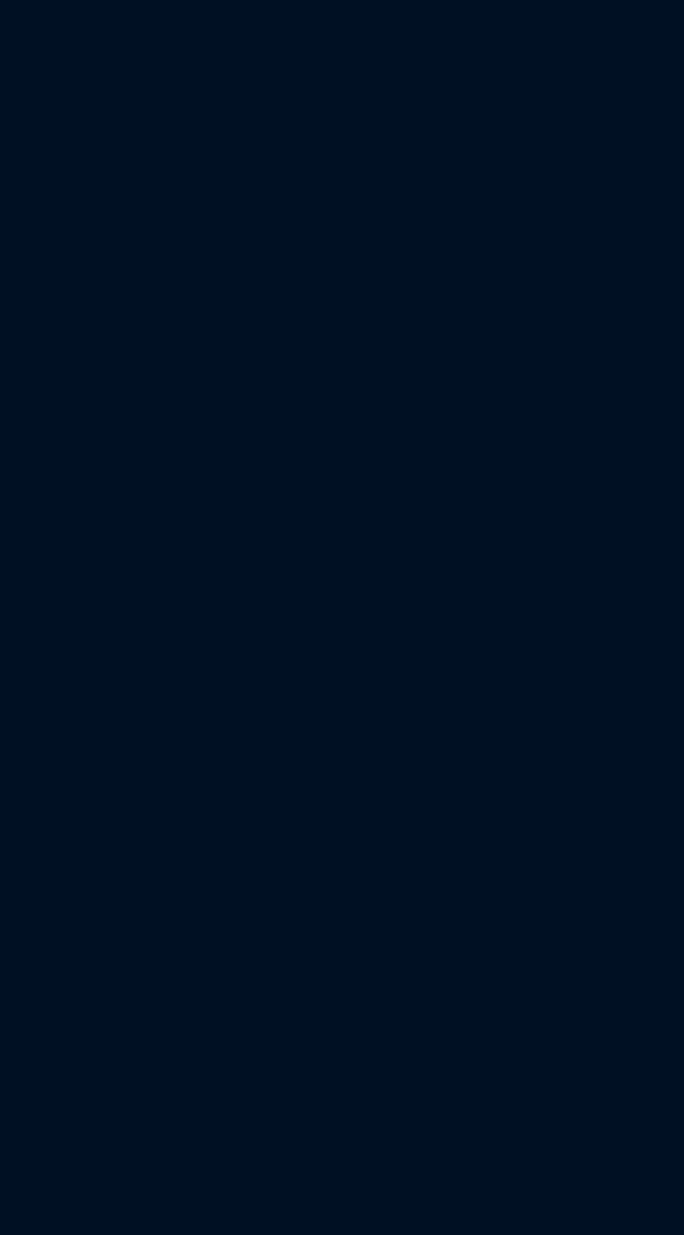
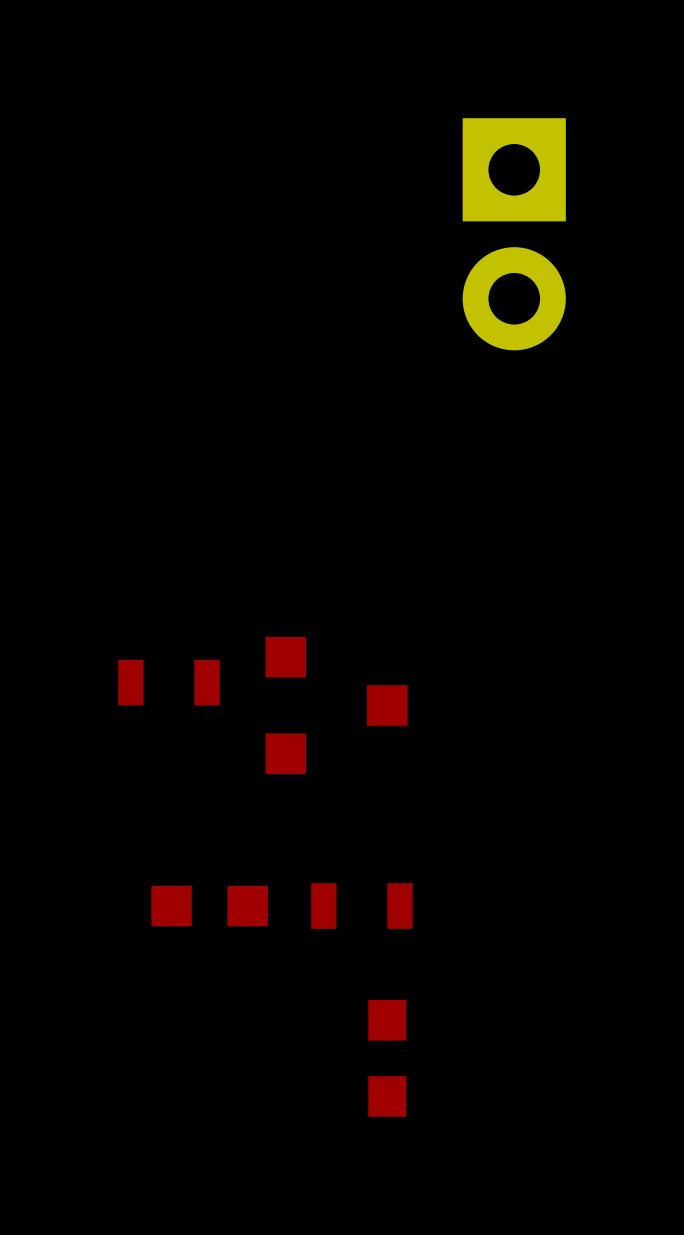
part: none -> (514, 234)
part: none -> (168, 682)
part: none -> (336, 705)
part: none -> (209, 906)
part: none -> (361, 906)
part: none -> (387, 1058)

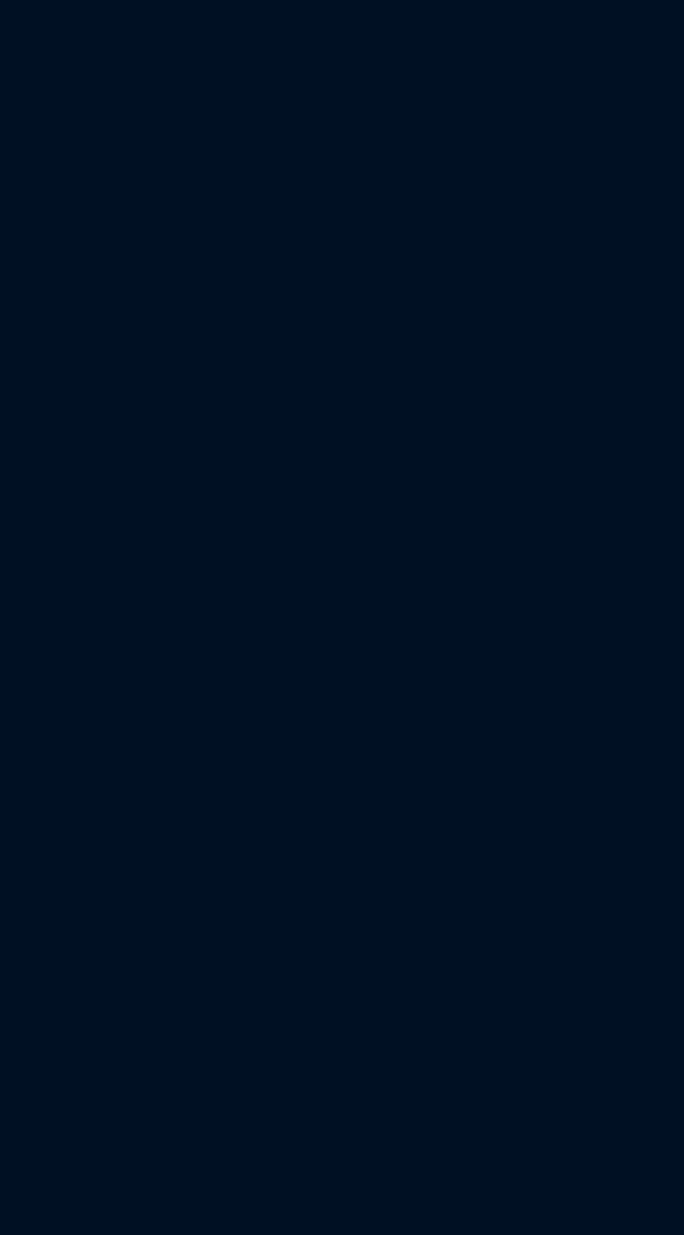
part: (514, 234) -> none
part: (168, 682) -> none
part: (336, 705) -> none
part: (209, 906) -> none
part: (361, 906) -> none
part: (387, 1058) -> none

